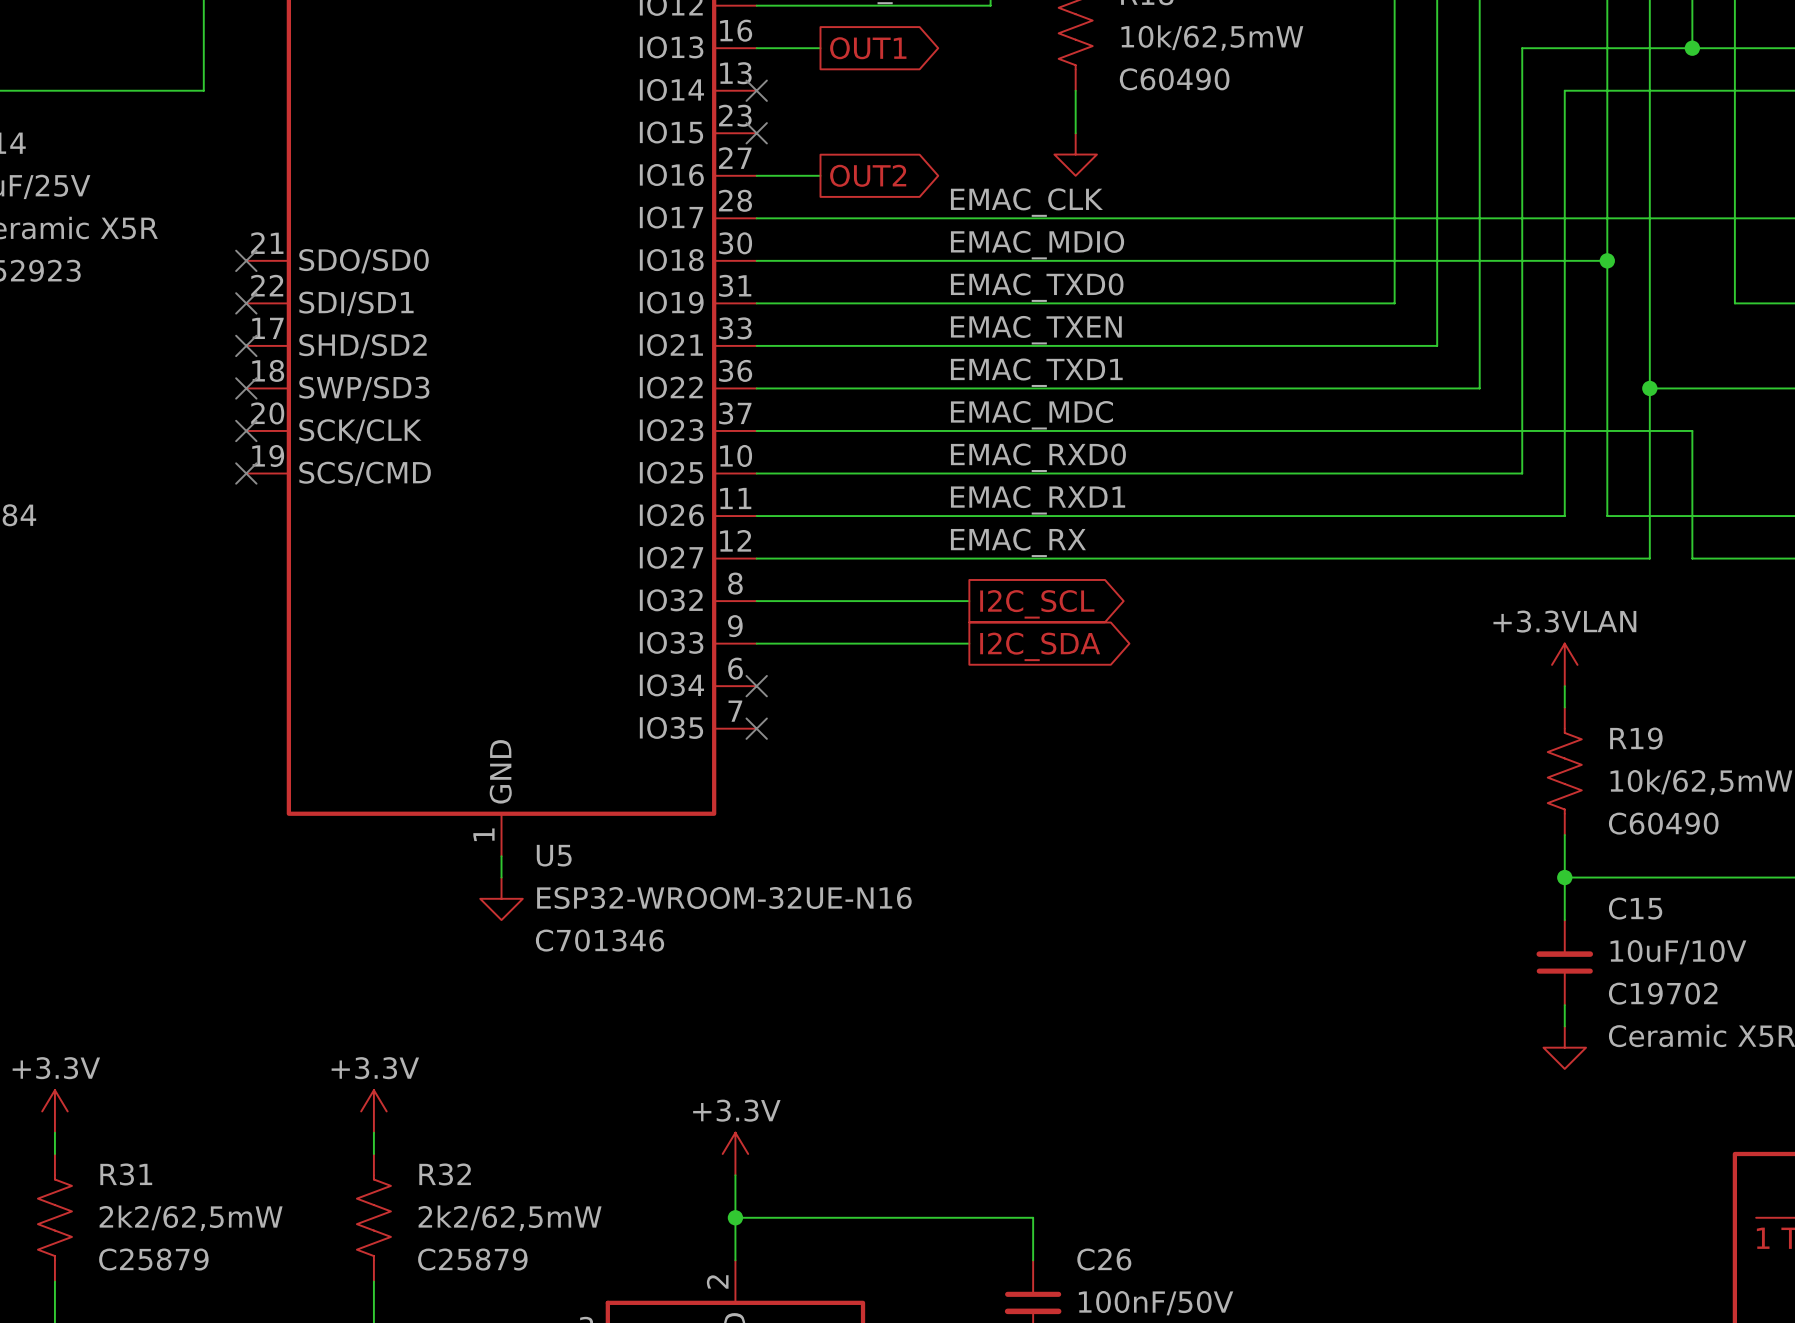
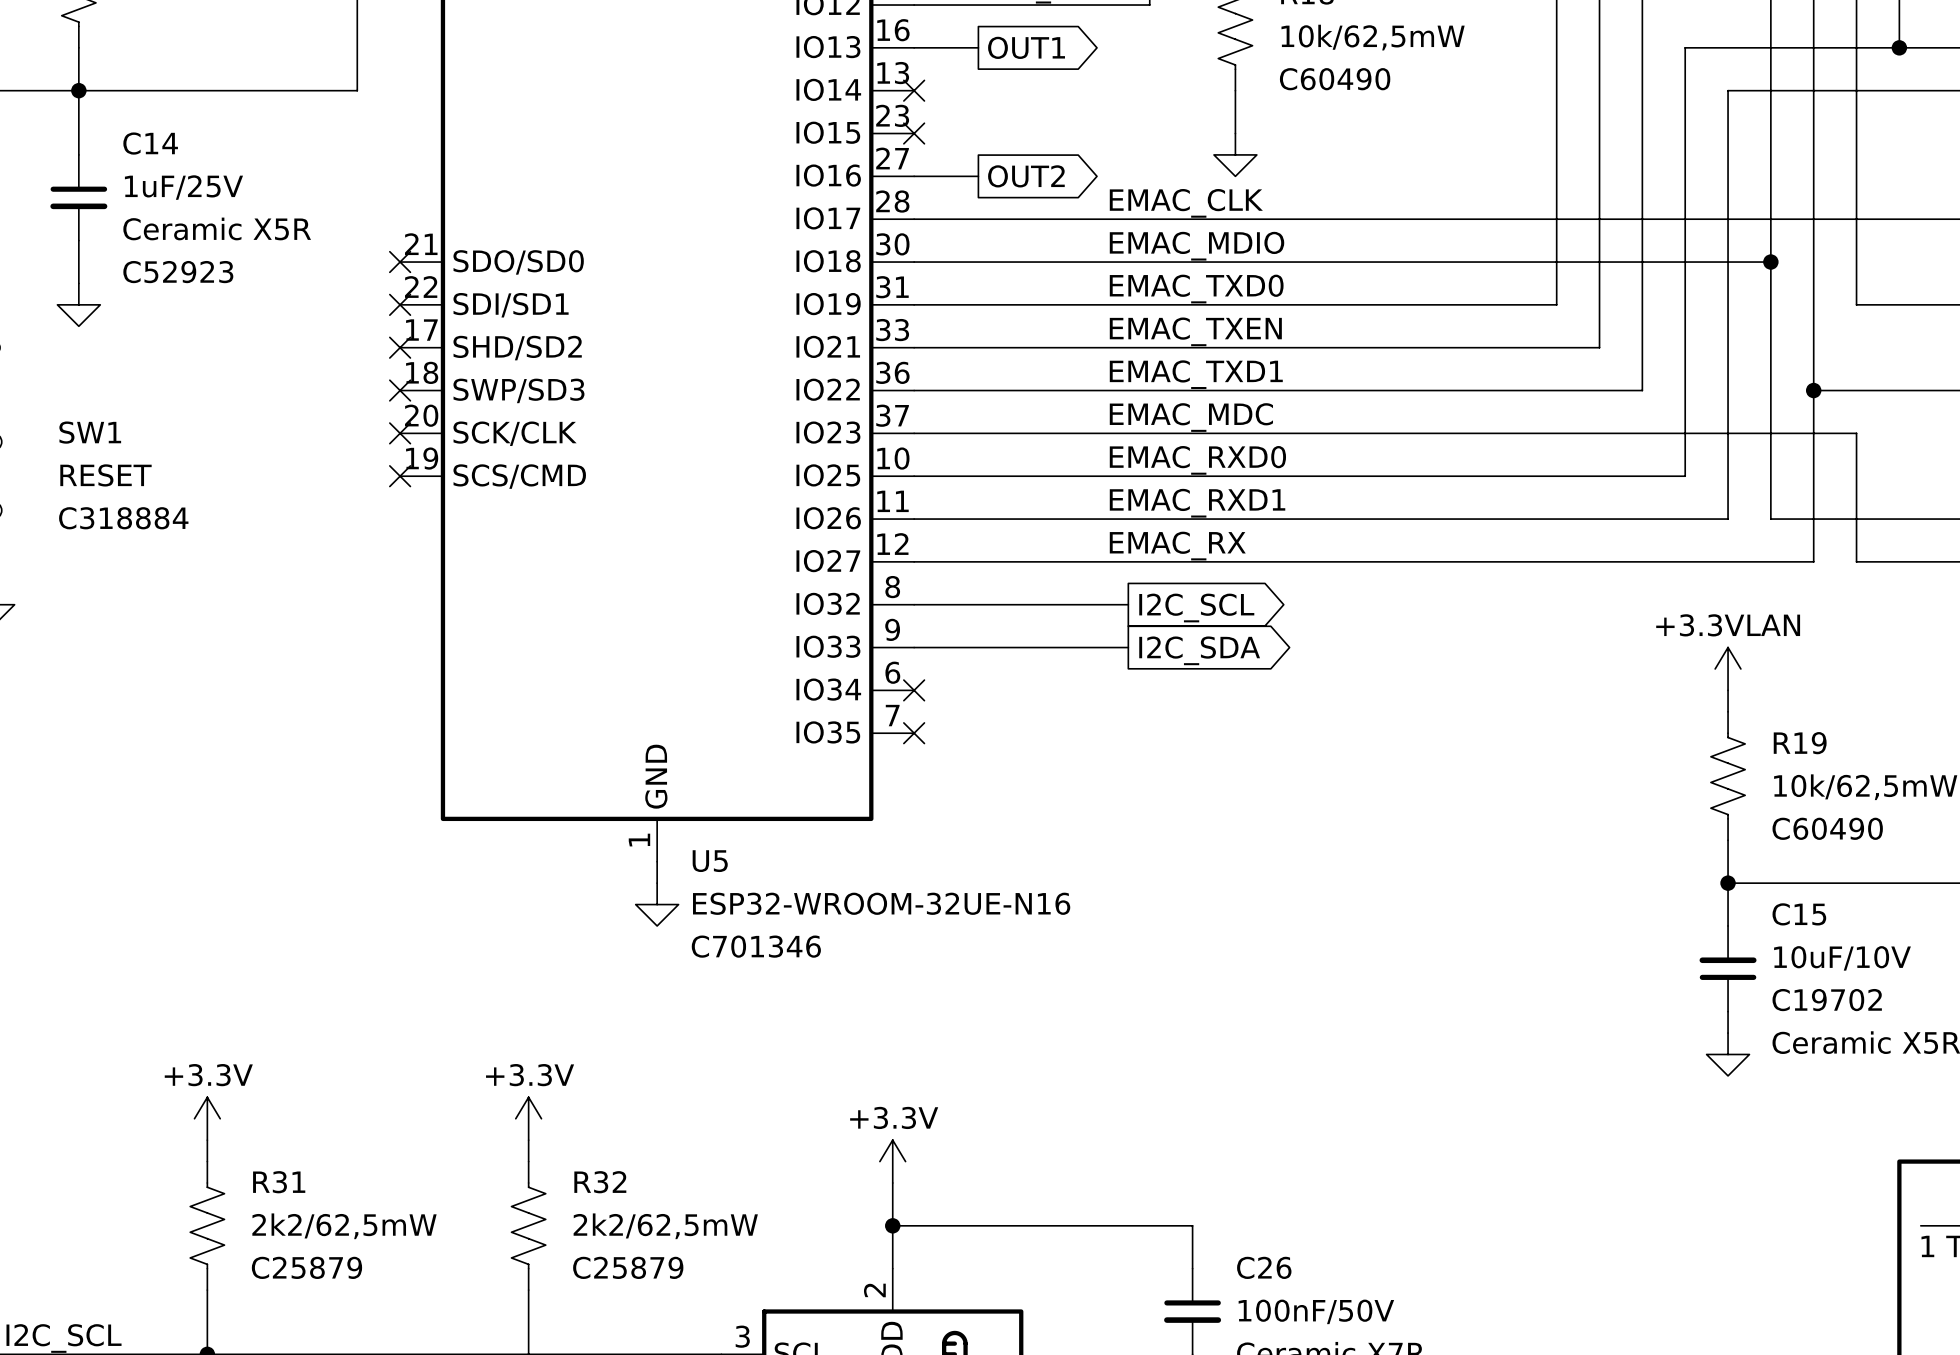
junction position: (1692, 48) -> (1899, 47)
wire: (1734, 48) (1734, 303) -> (1856, 47) (1856, 304) (1899, 304)

